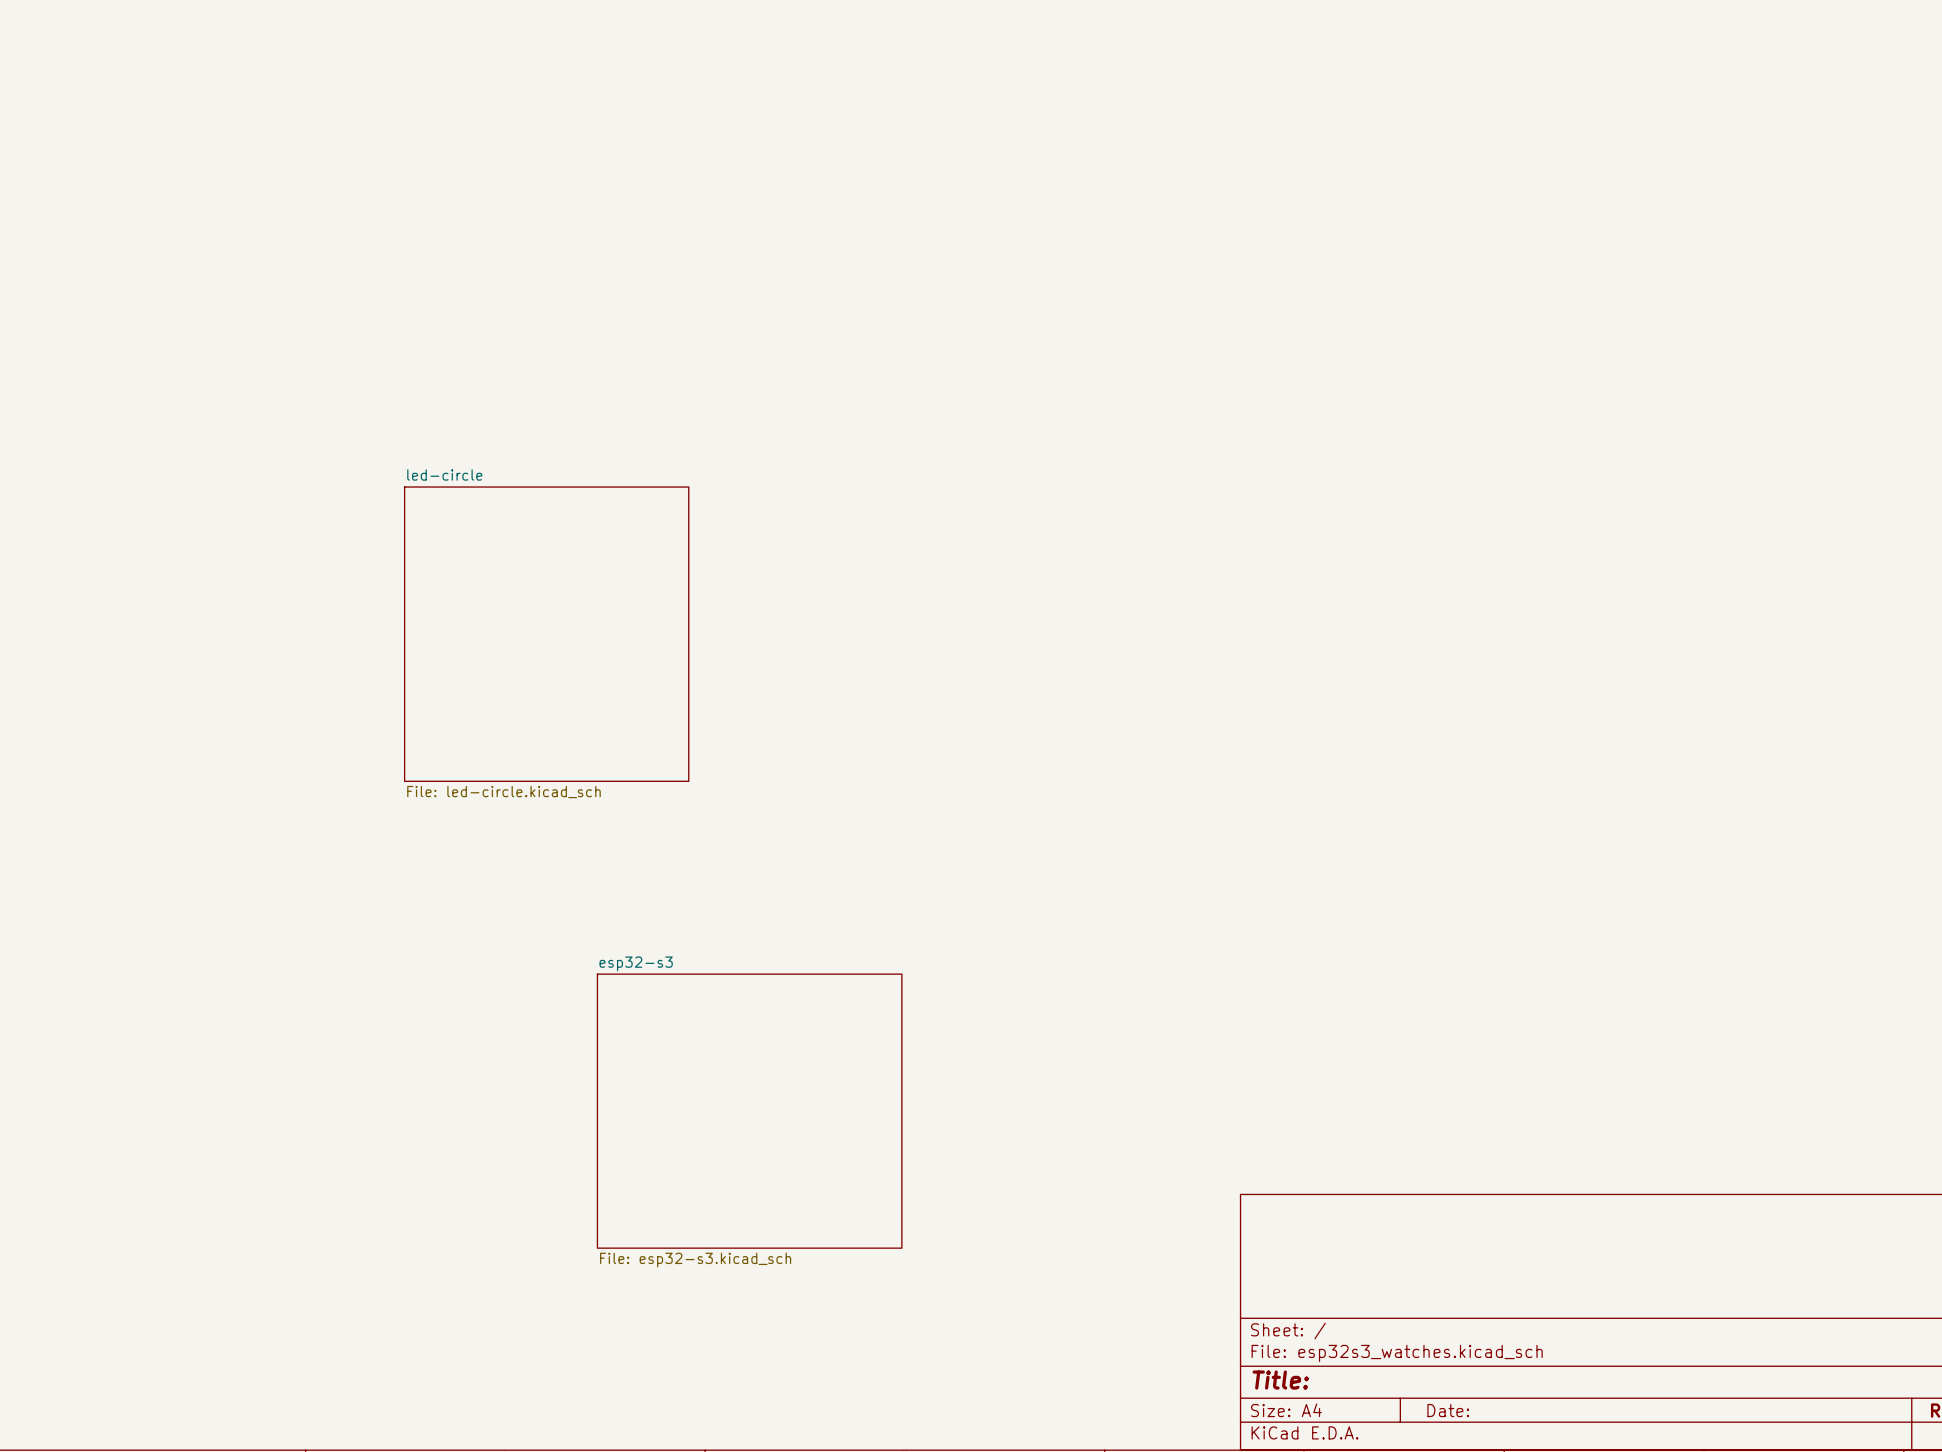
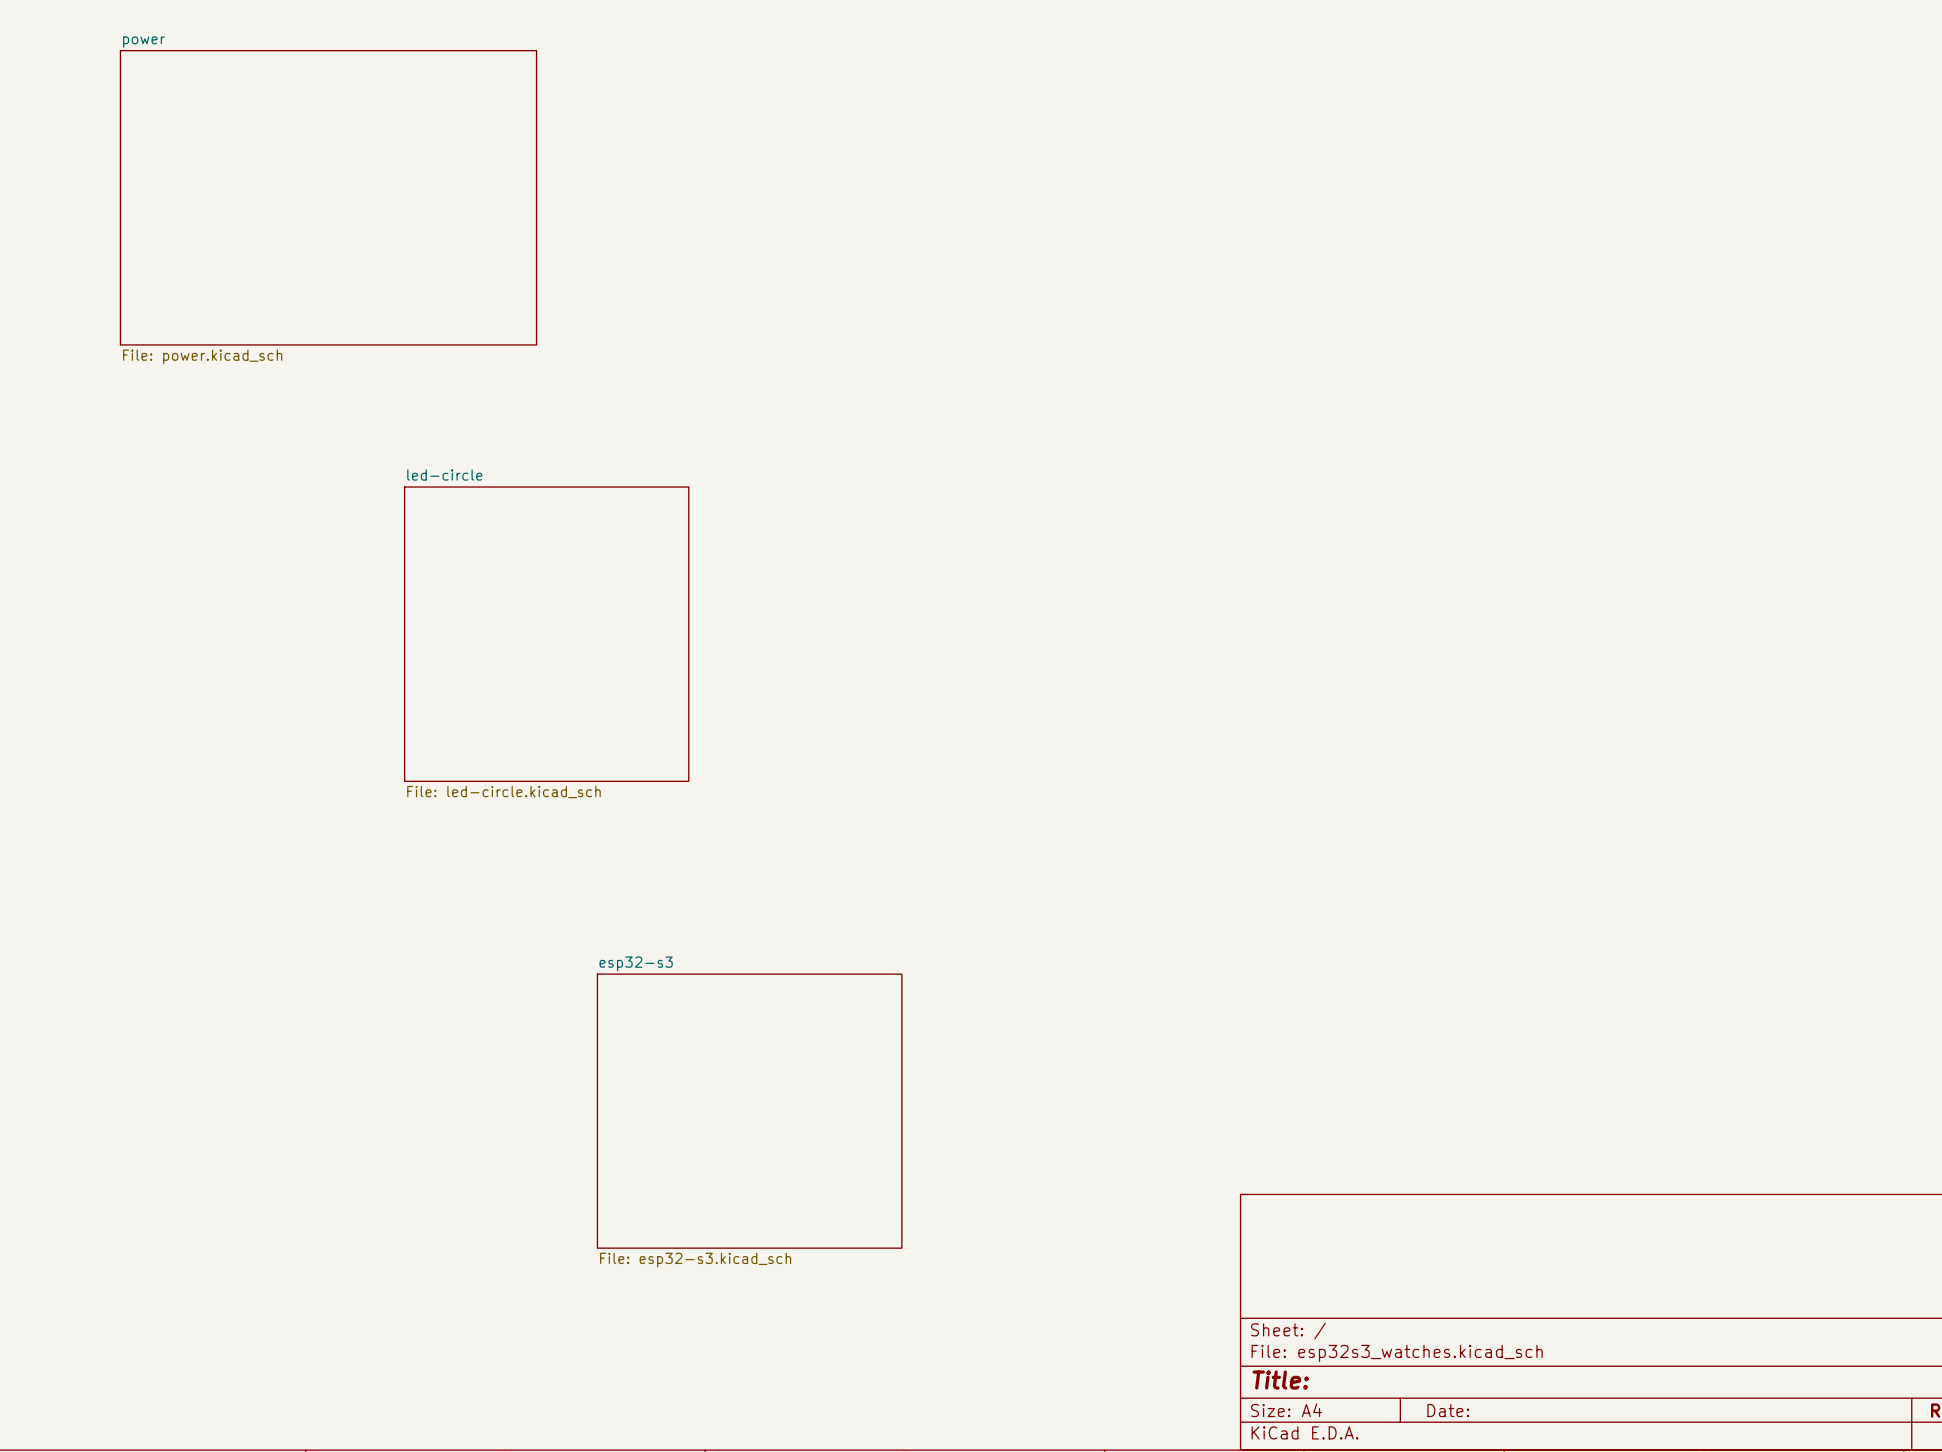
sheet power: none -> File: power.kicad_sch (328, 197)

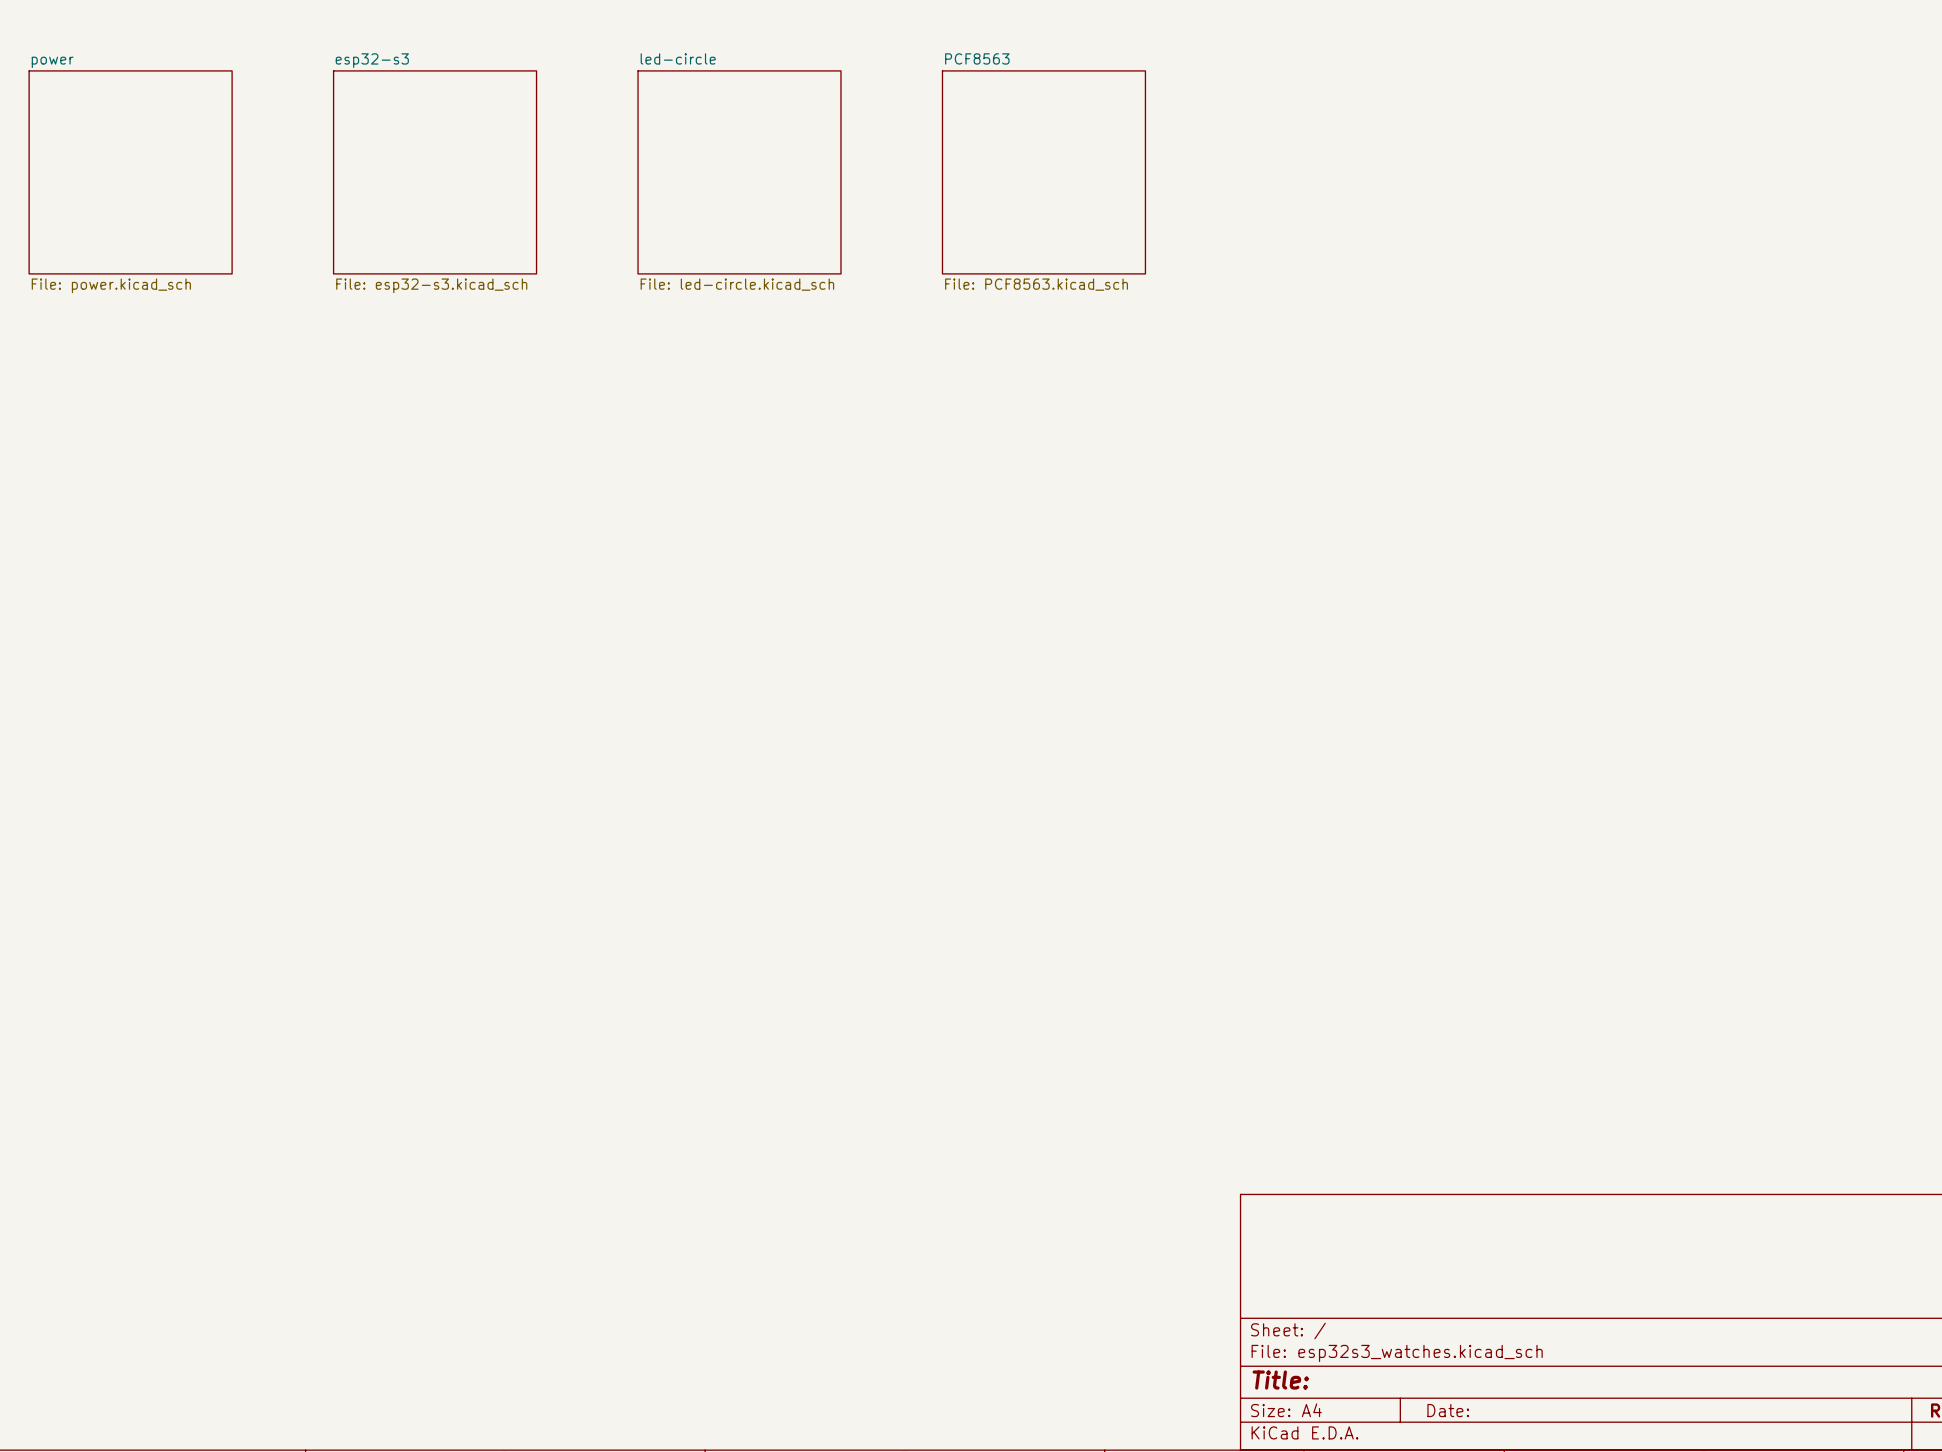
sheet power: none -> File: power.kicad_sch (130, 172)
sheet led-circle: none -> File: led-circle.kicad_sch (739, 172)
sheet PCF8563: none -> File: PCF8563.kicad_sch (1043, 172)
sheet power: File: power.kicad_sch (328, 197) -> none
sheet led-circle: File: led-circle.kicad_sch (546, 634) -> none
sheet esp32-s3 name position: esp32-s3 (636, 963) -> esp32-s3 (372, 60)
sheet esp32-s3 shape: [596, 973, 903, 1249] -> [332, 70, 538, 275]
sheet esp32-s3 value position: File: esp32-s3.kicad_sch (695, 1260) -> File: esp32-s3.kicad_sch (431, 285)

